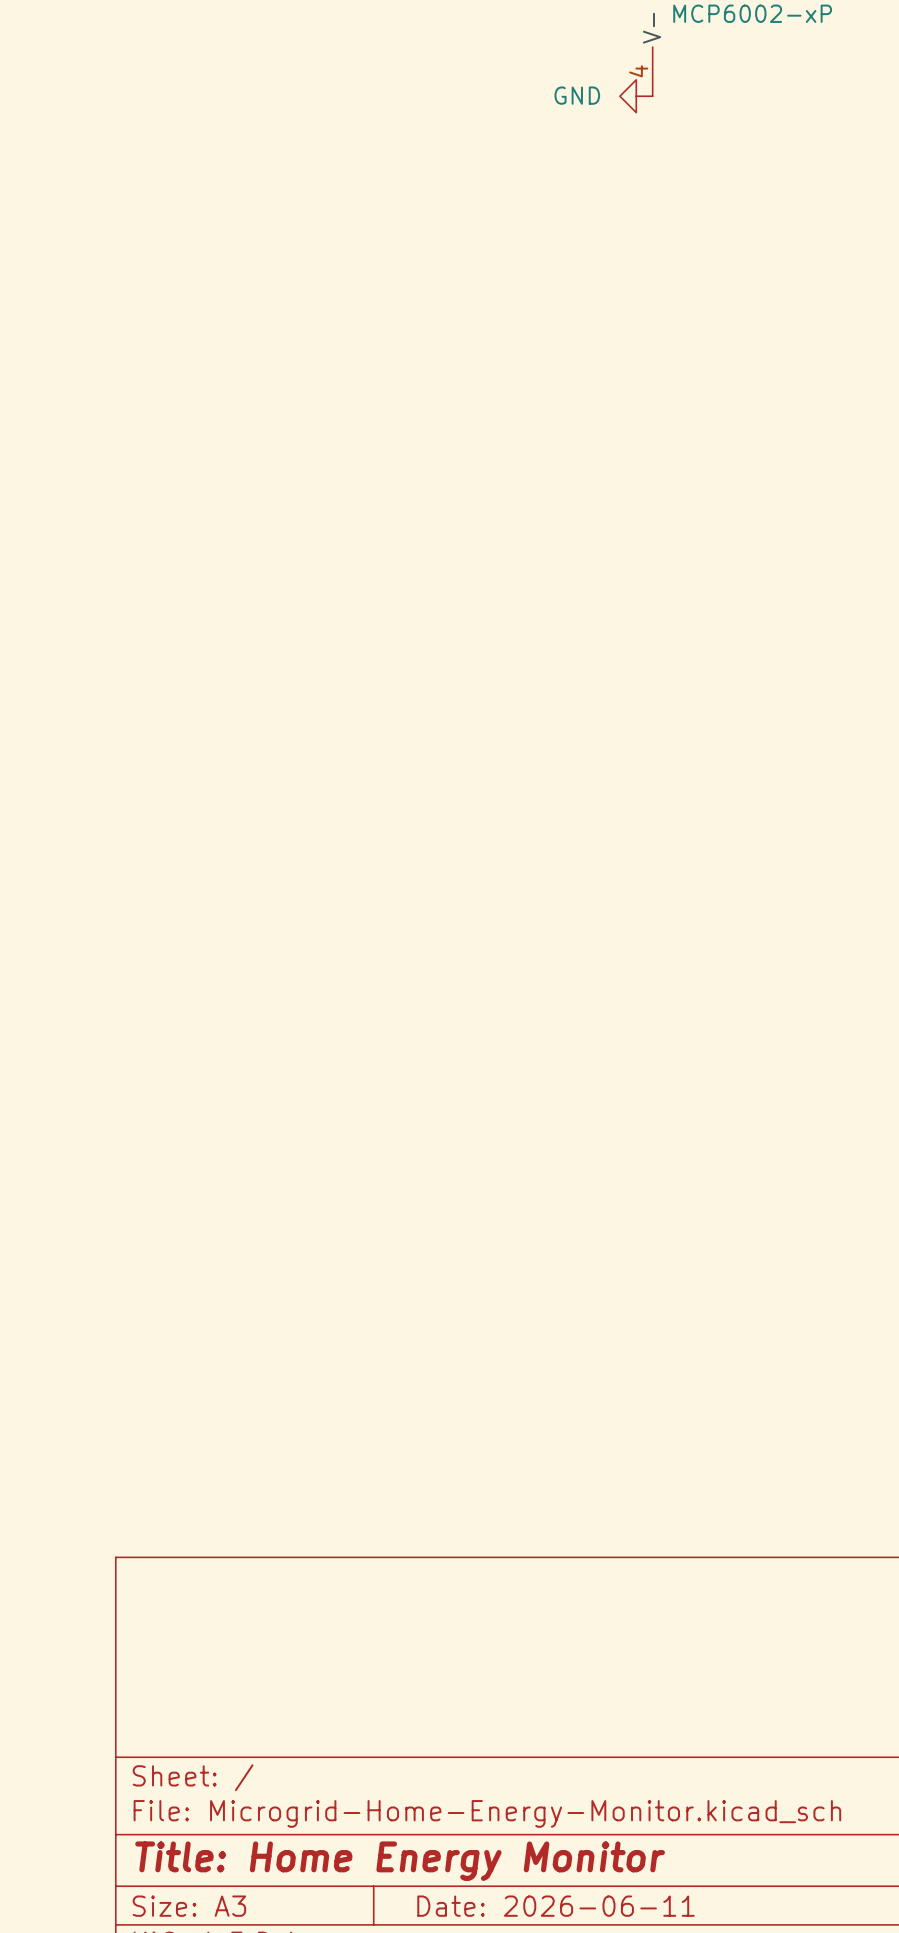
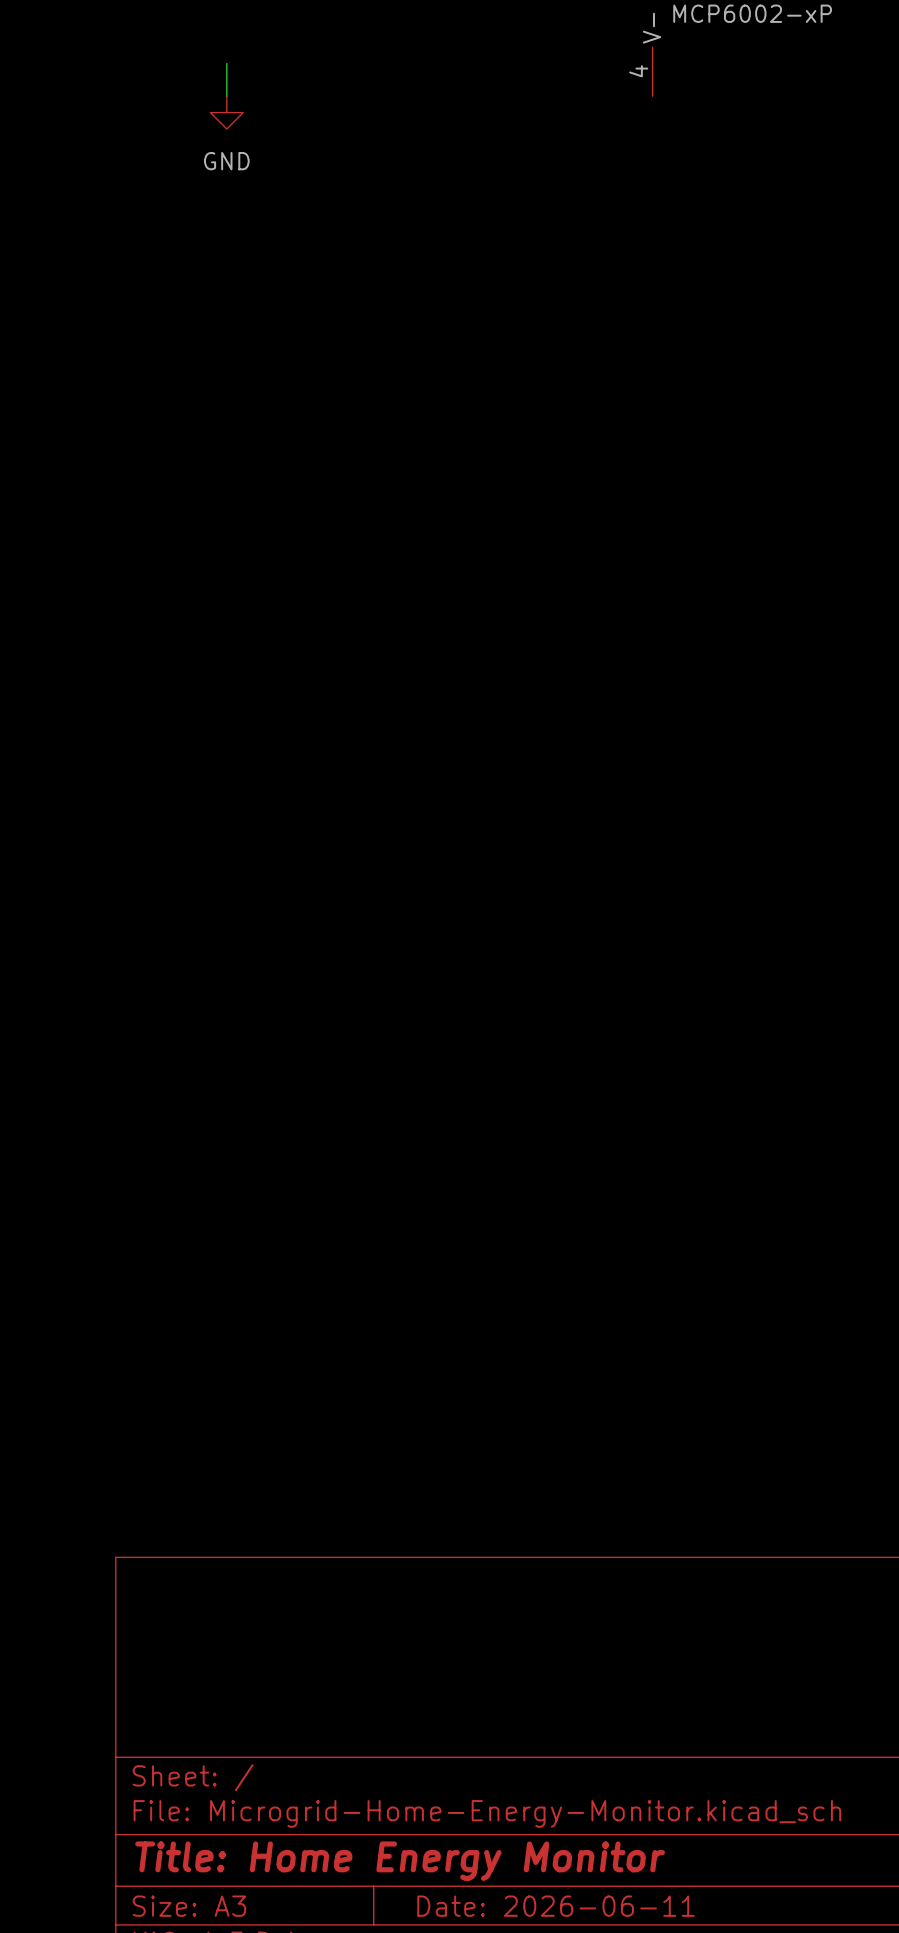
wire: none -> (226, 63) (226, 96)
power symbol: GND (636, 96) -> none
power symbol: none -> GND (226, 112)

